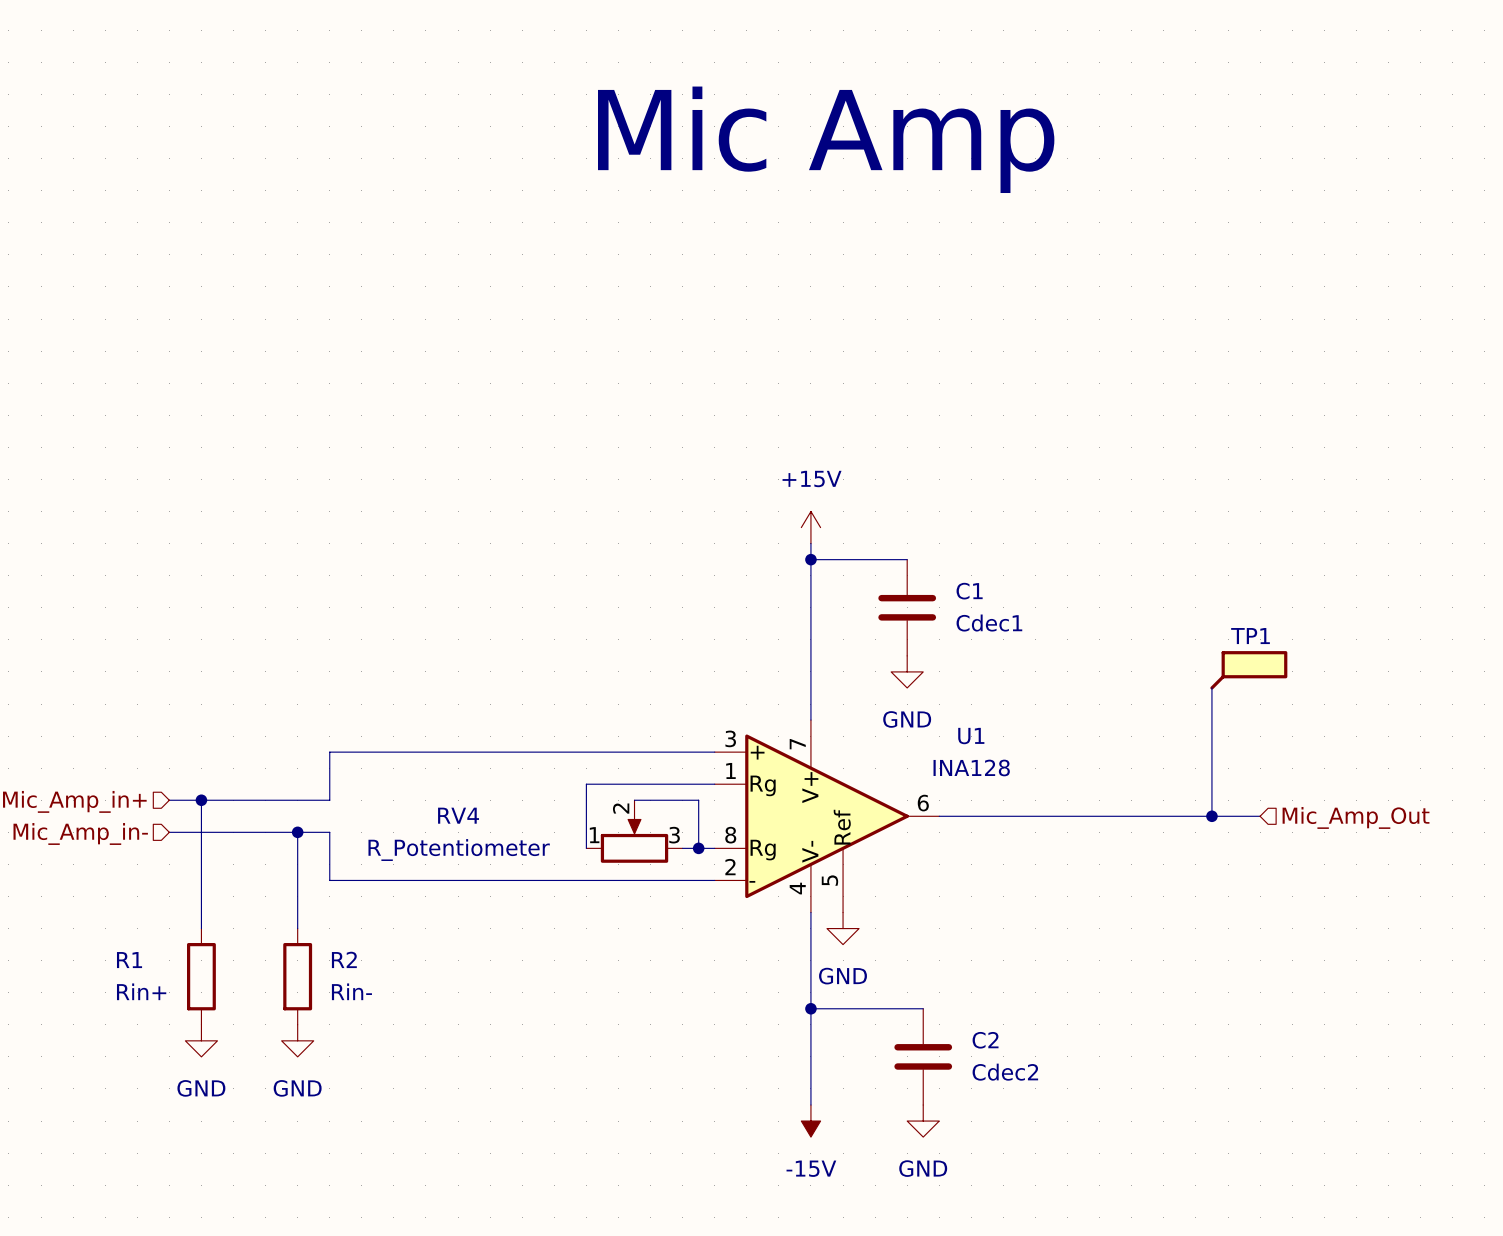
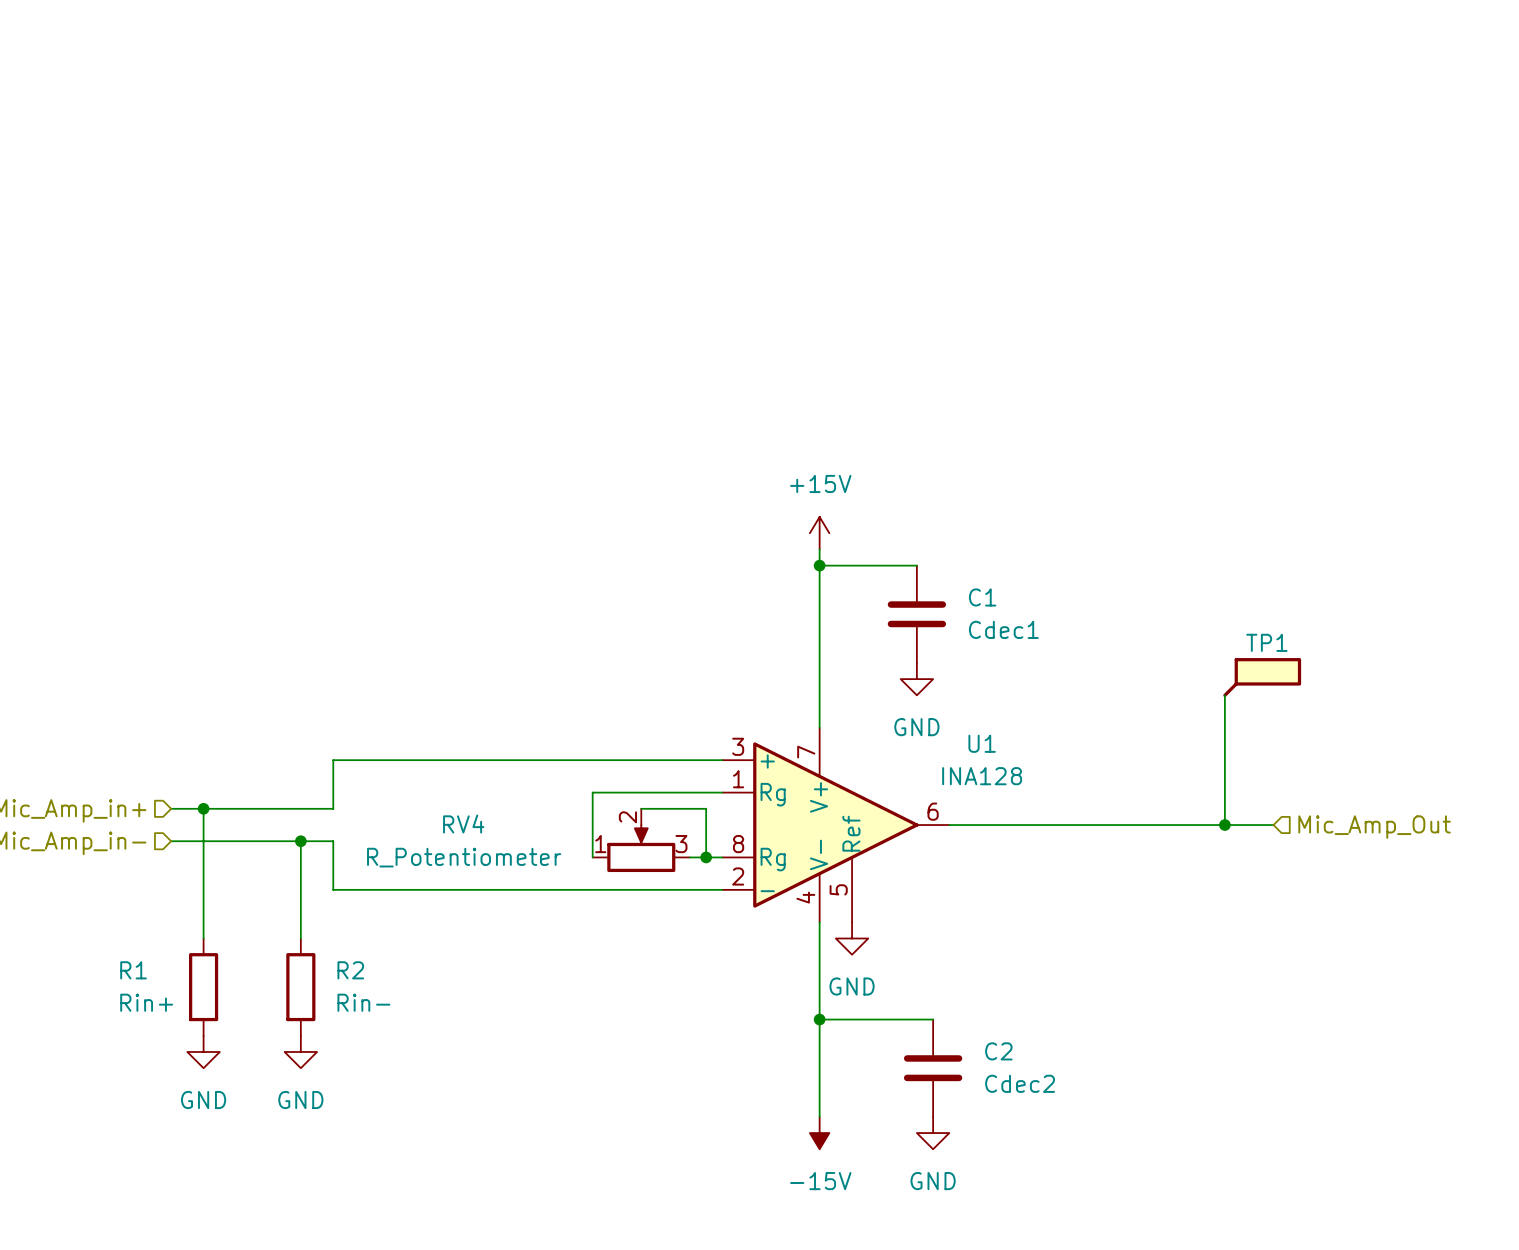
text: Mic Amp (826, 139) -> none

